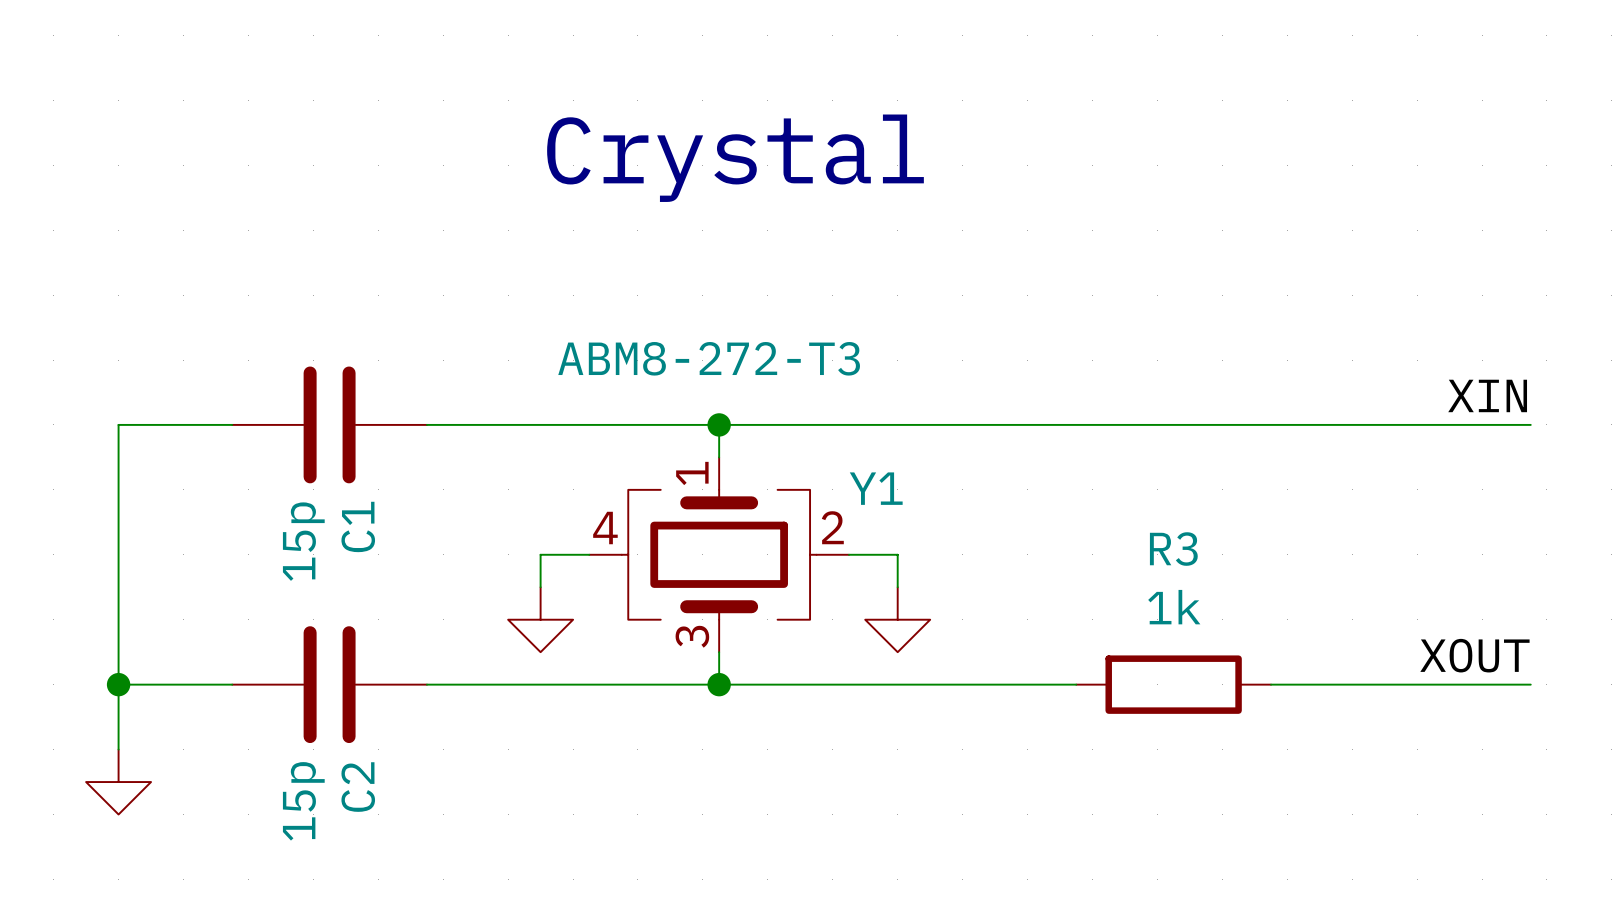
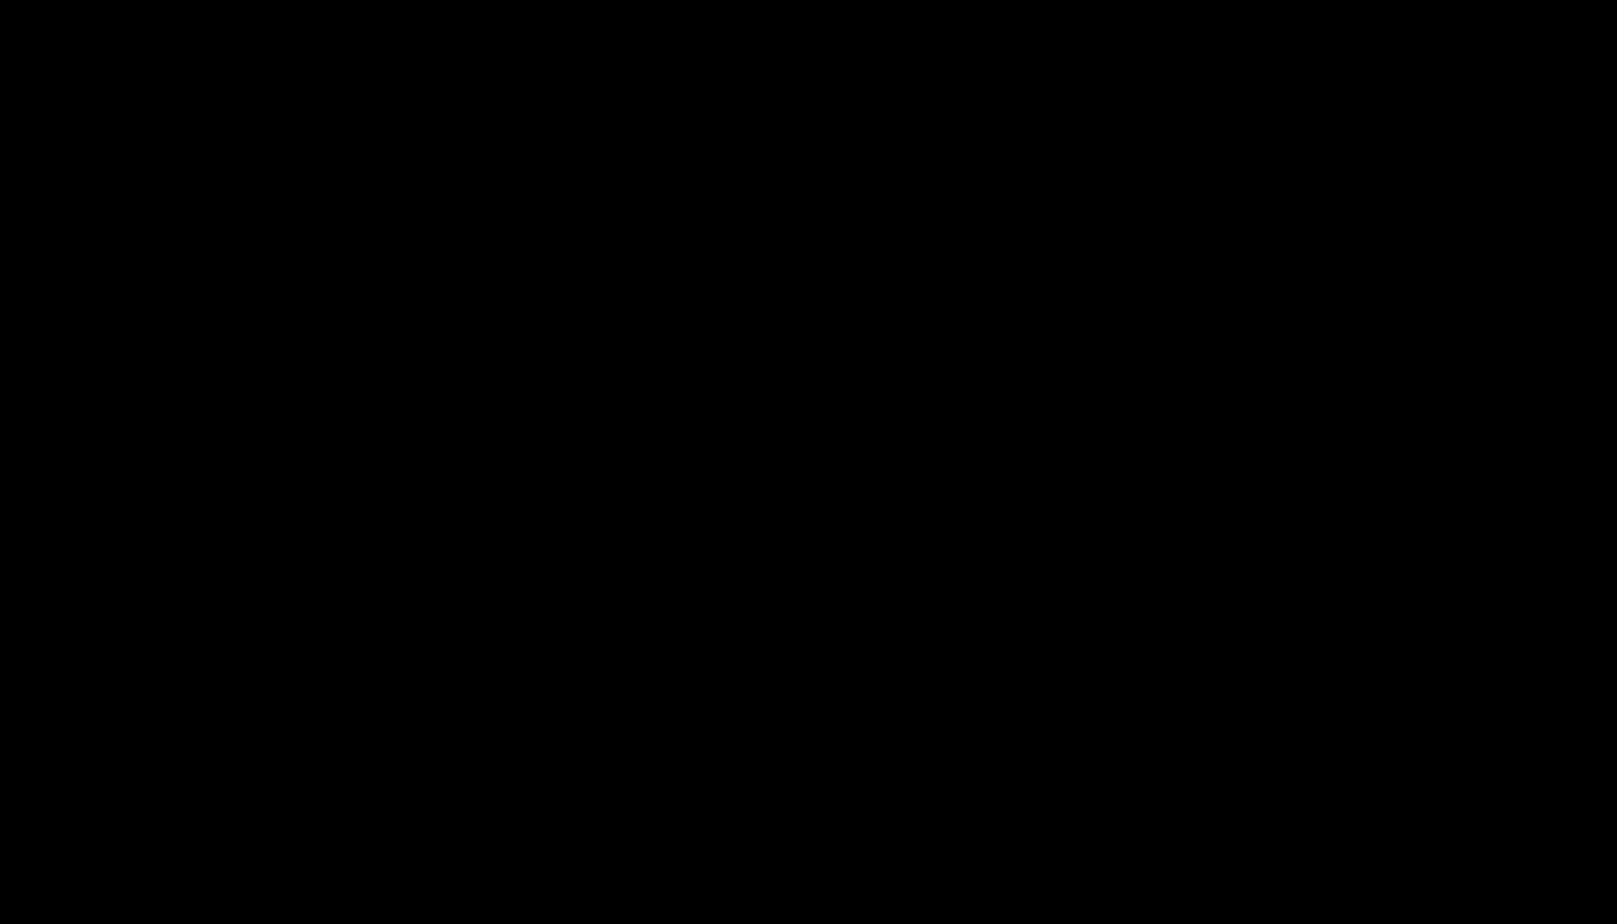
text: Crystal (735, 158) -> none
label: XIN (1487, 395) -> none
wire: (232, 424) (118, 424) (118, 749) -> none
C1: 15p (329, 424) -> none
wire: (426, 424) (1530, 424) -> none
wire: (719, 424) (719, 457) -> none
junction: (719, 424) -> none
wire: (589, 554) (540, 554) (540, 587) -> none
Y1: ABM8-272-T3 (719, 554) -> none
wire: (849, 554) (897, 554) (897, 587) -> none
power symbol: (540, 619) -> none
power symbol: (897, 619) -> none
wire: (719, 652) (719, 684) -> none
label: XOUT (1474, 655) -> none
wire: (118, 684) (232, 684) -> none
junction: (118, 684) -> none
C2: 15p (329, 684) -> none
wire: (426, 684) (1076, 684) -> none
junction: (719, 684) -> none
R3: 1k (1173, 684) -> none
wire: (1271, 684) (1530, 684) -> none
power symbol: (118, 782) -> none

